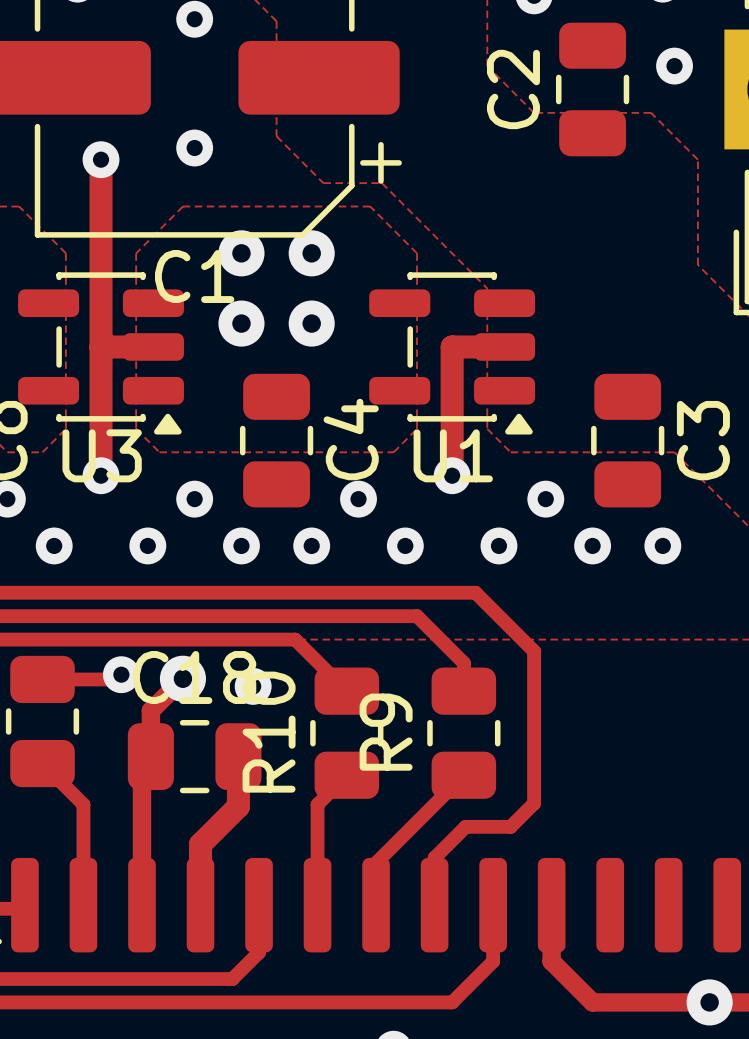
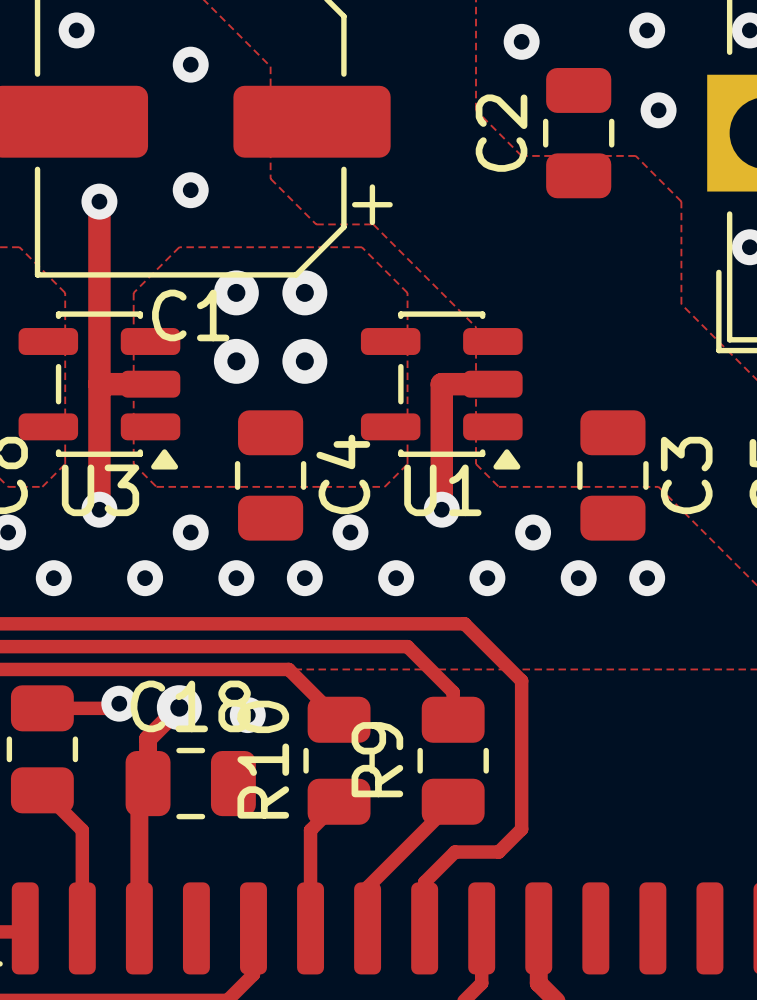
track: (238, 756) (238, 806) (200, 844) (200, 905) -> none

